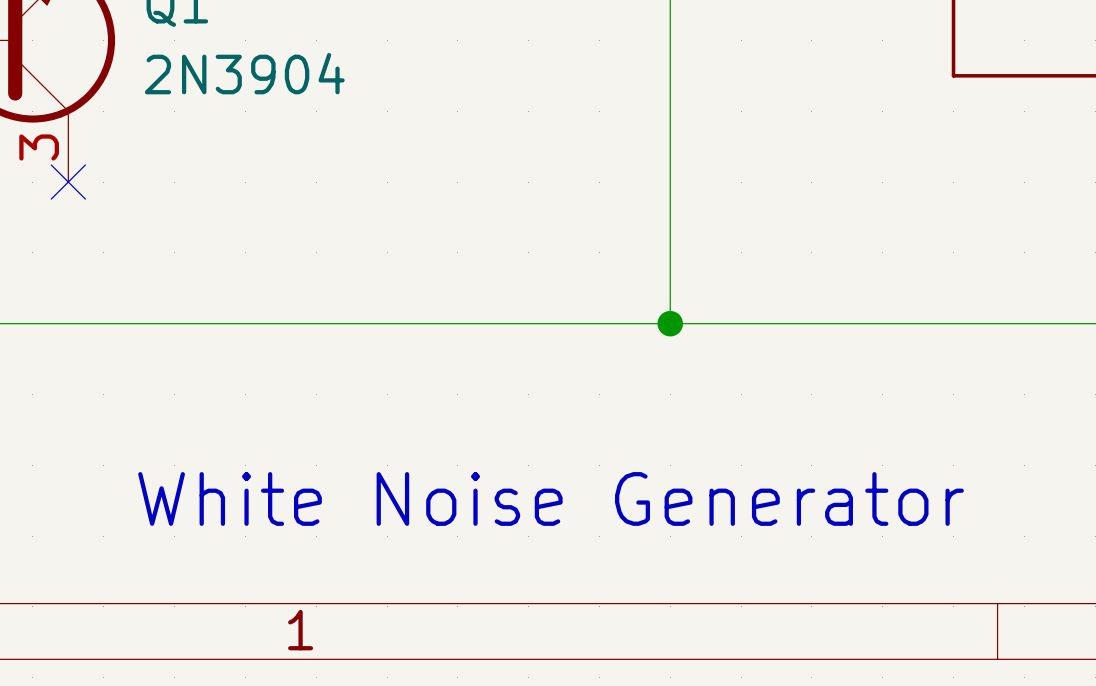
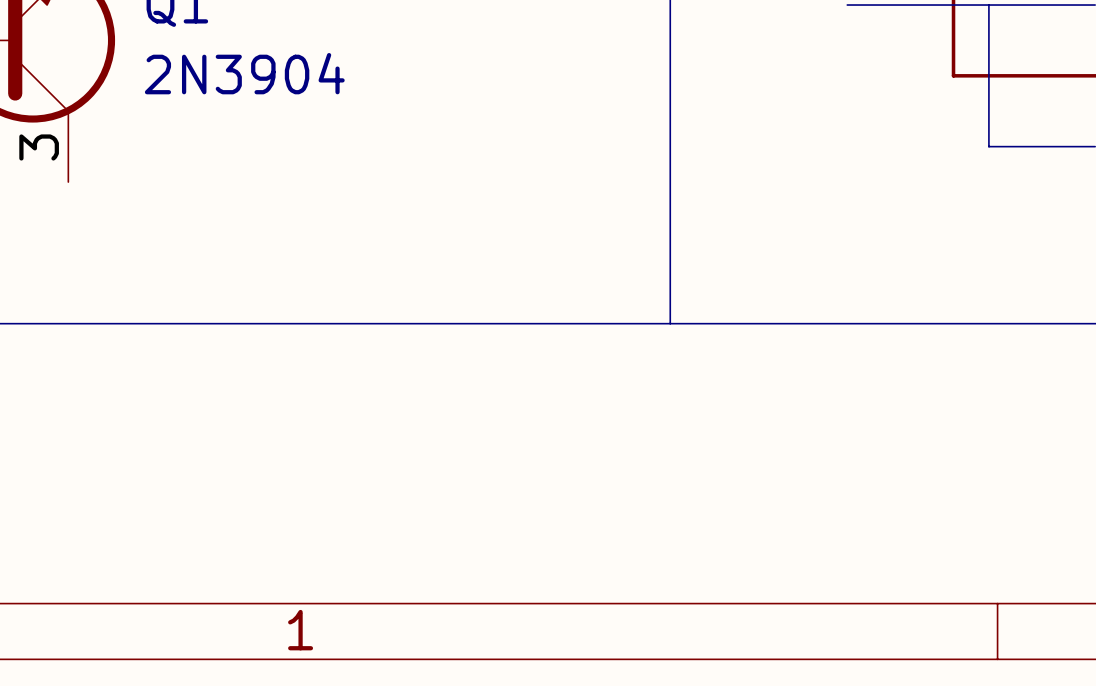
wire: none -> (847, 5) (1095, 5)
wire: none -> (988, 5) (988, 146) (1095, 146)
no-connect mark: (68, 182) -> none
junction: (670, 323) -> none
text: White Noise Generator (551, 498) -> none

